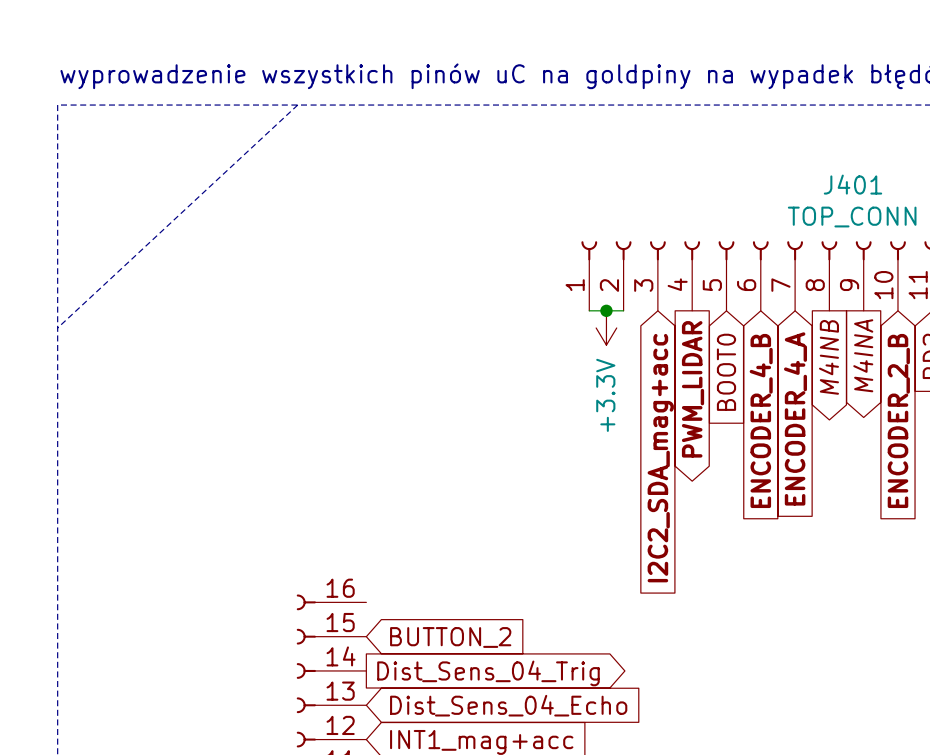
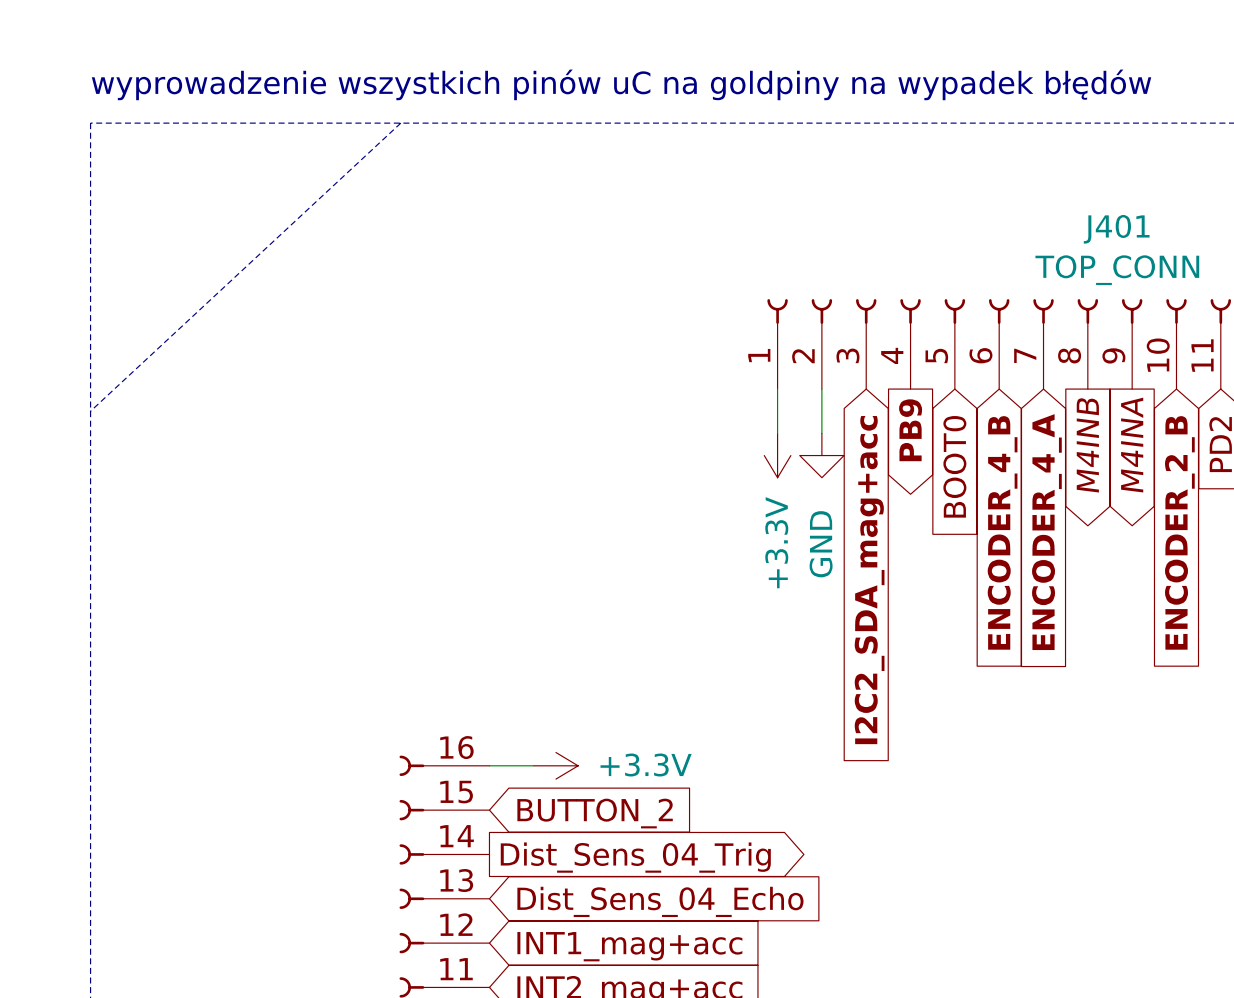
wire: (589, 310) (623, 310) -> (777, 389) (777, 433)
junction: (606, 310) -> none
wire: none -> (821, 389) (821, 433)
power symbol position: +3.3V (606, 327) -> +3.3V (777, 455)
power symbol: none -> GND (821, 455)
global label: PWM_LIDAR (693, 389) -> PB9 (910, 430)
wire: none -> (489, 765) (533, 765)
power symbol: none -> +3.3V (555, 765)

